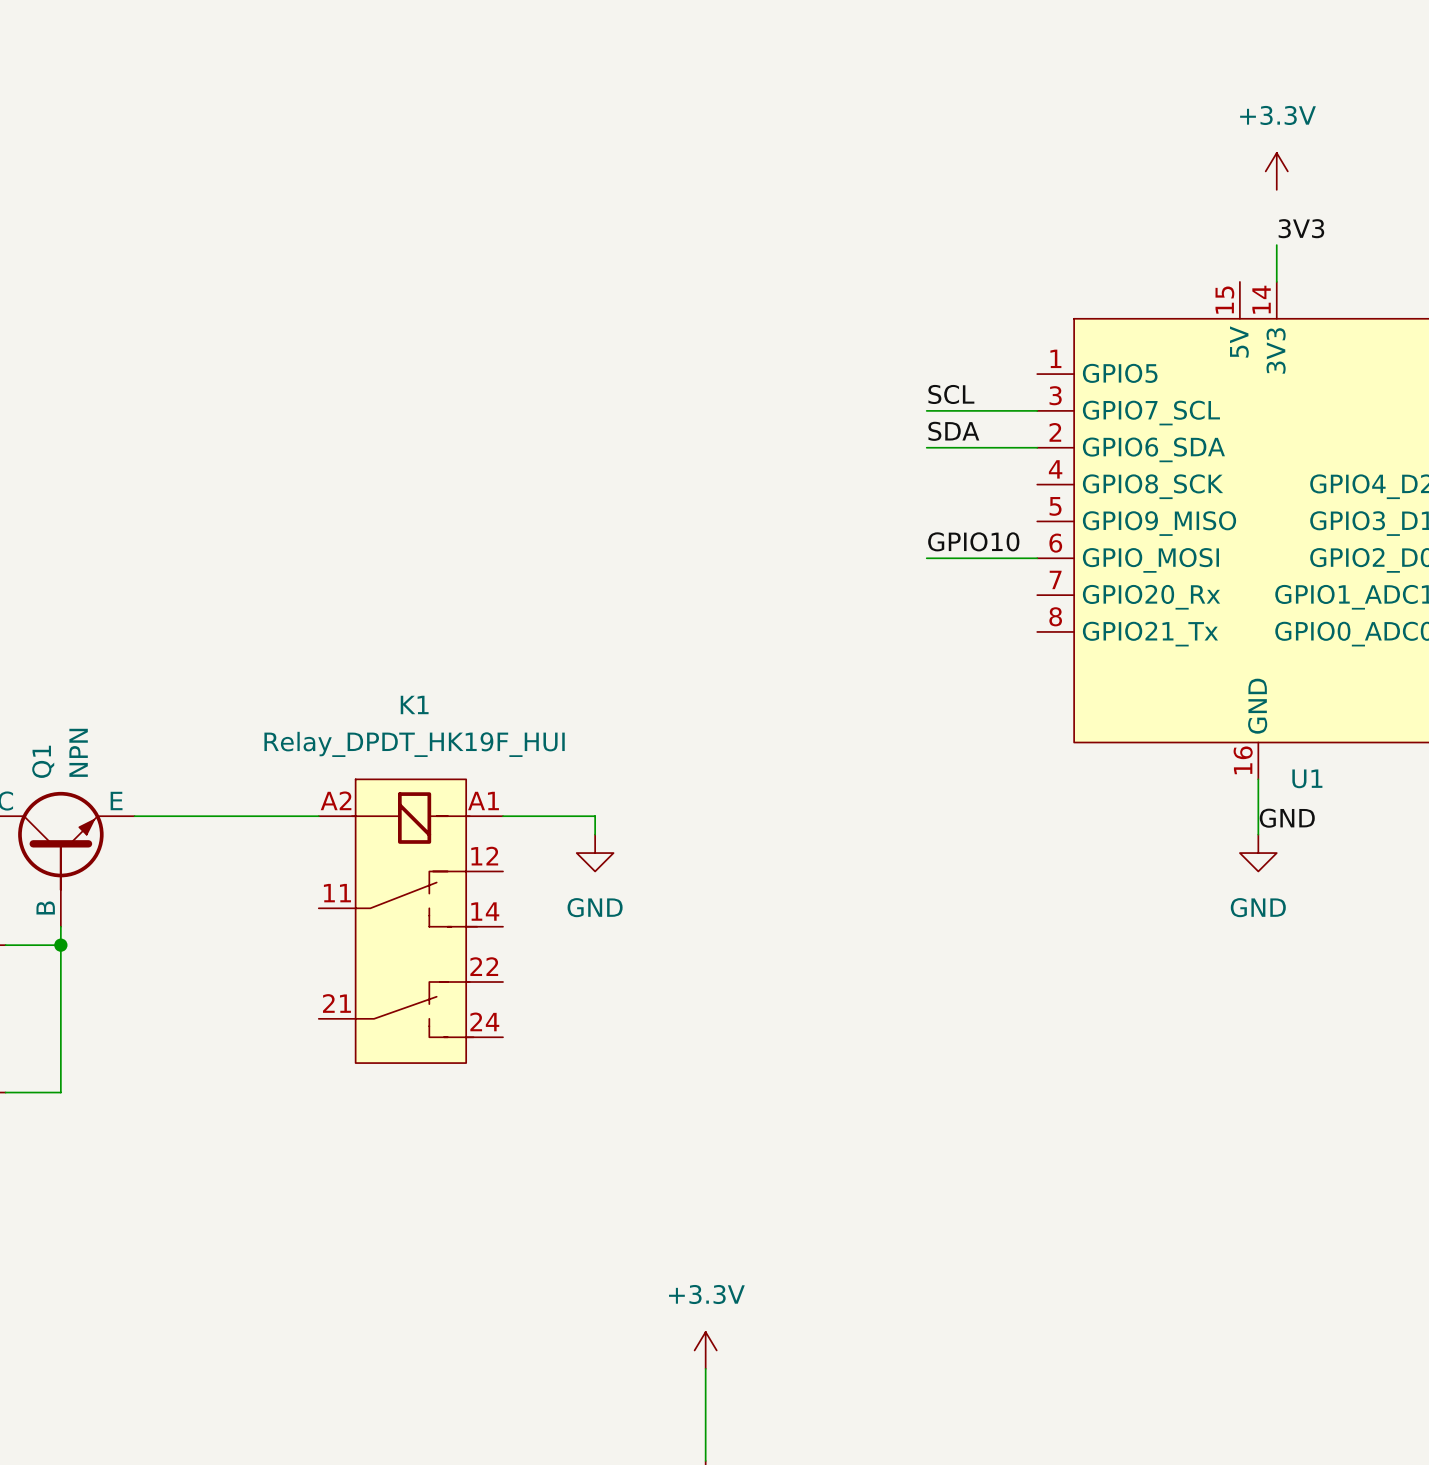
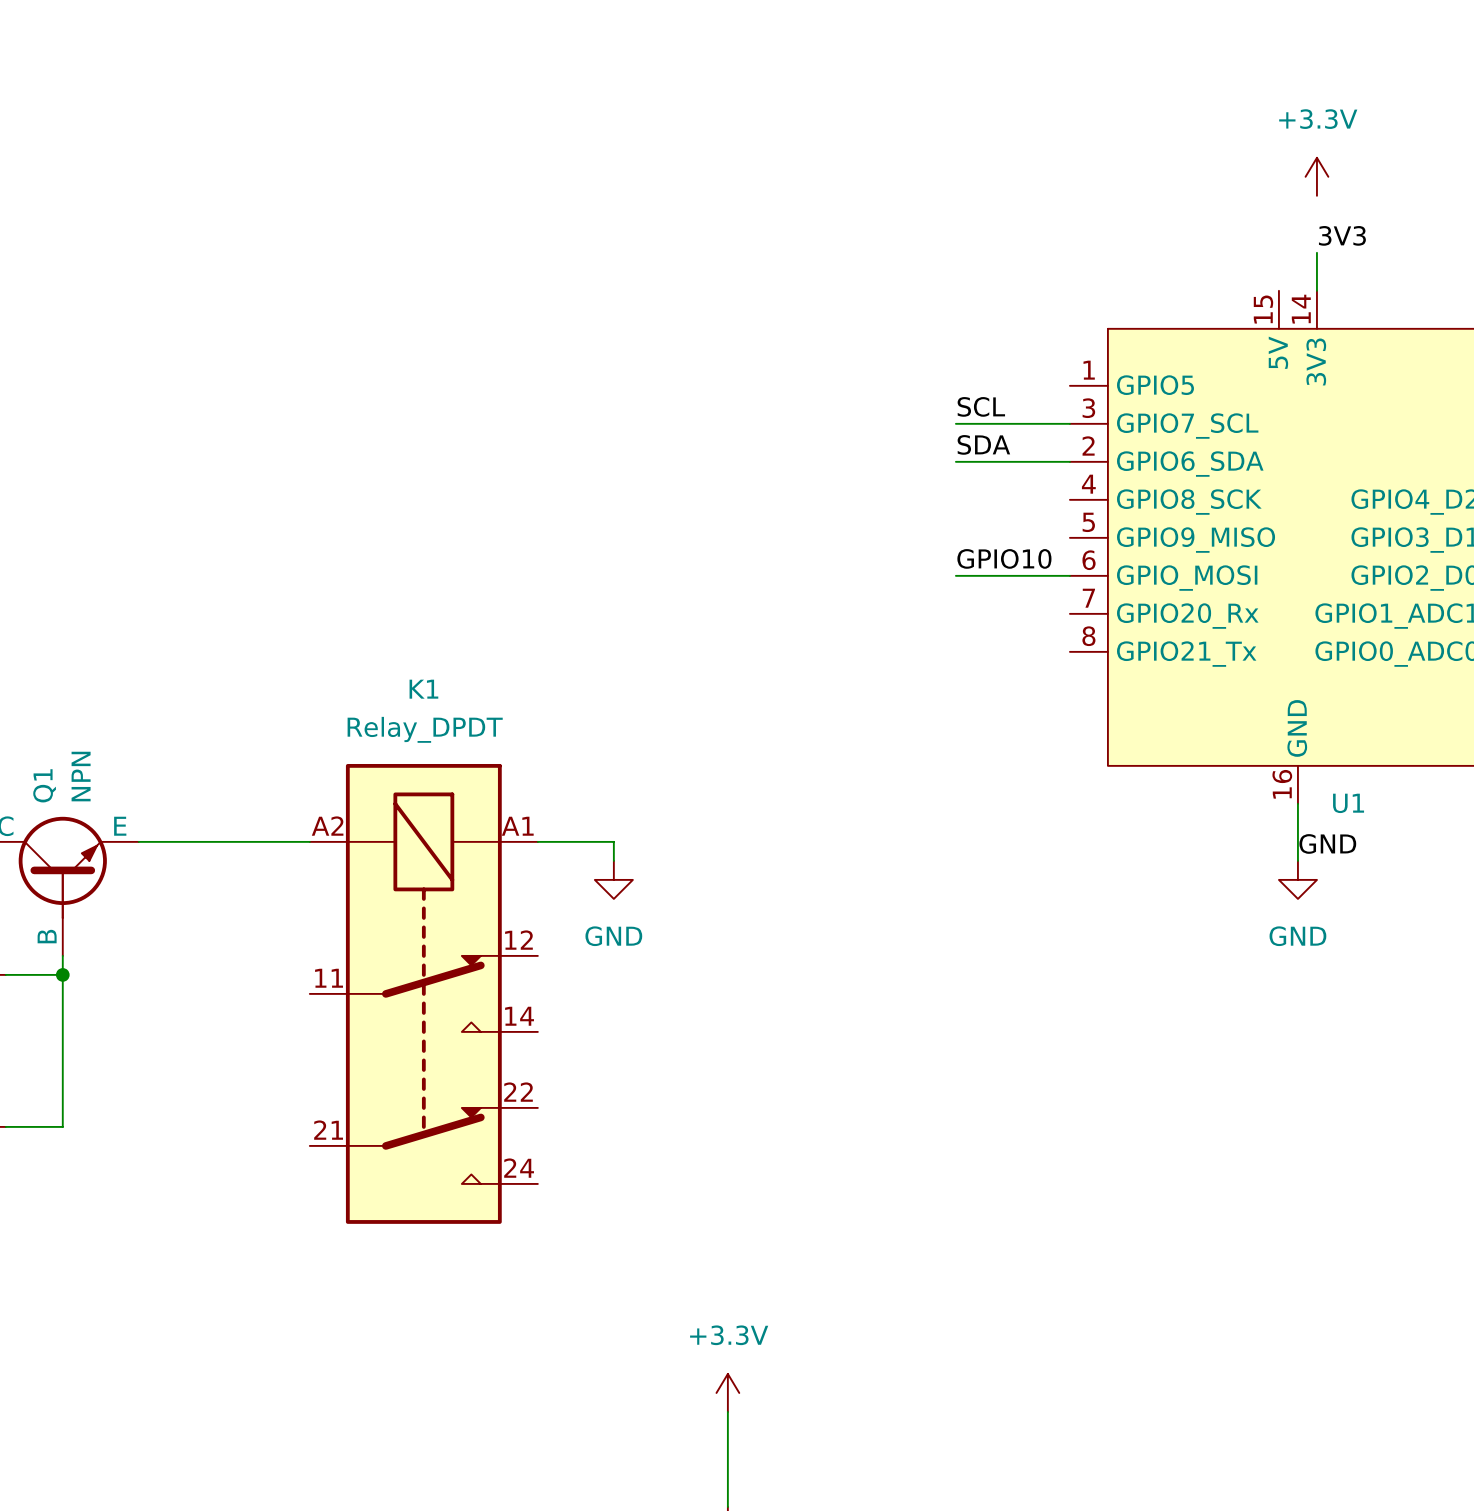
K1 name position: K1 (414, 704) -> K1 (423, 689)
K1 value: Relay_DPDT_HK19F_HUI (414, 744) -> Relay_DPDT (425, 729)
K1 symbol: [318, 779, 504, 1064] -> [309, 763, 538, 1224]

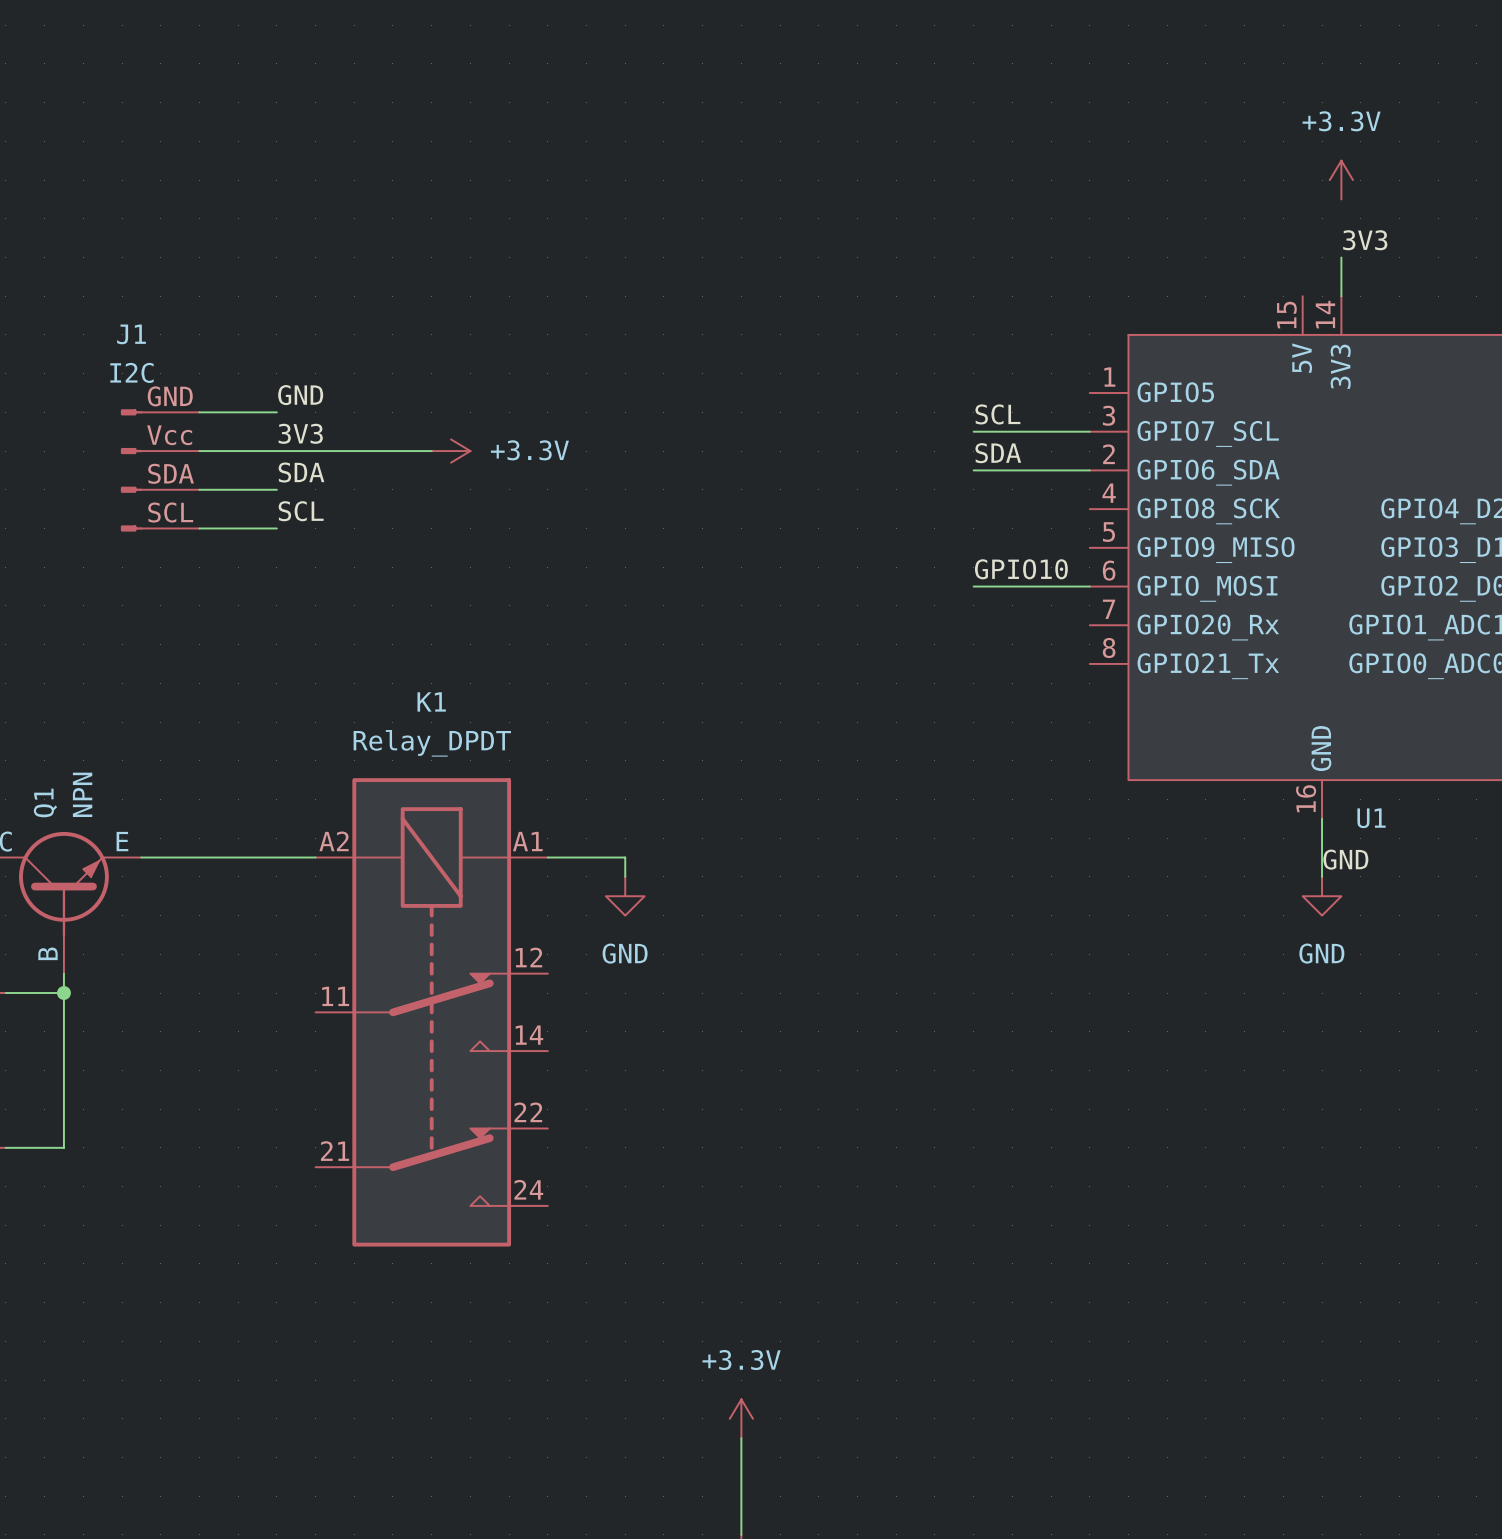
label: none -> GND (300, 395)
wire: none -> (199, 412) (276, 412)
label: none -> 3V3 (300, 433)
wire: none -> (199, 451) (431, 451)
power symbol: none -> +3.3V (451, 451)
J1: none -> I2C (160, 470)
label: none -> SDA (301, 472)
wire: none -> (199, 489) (276, 489)
label: none -> SCL (301, 511)
wire: none -> (199, 528) (276, 528)

